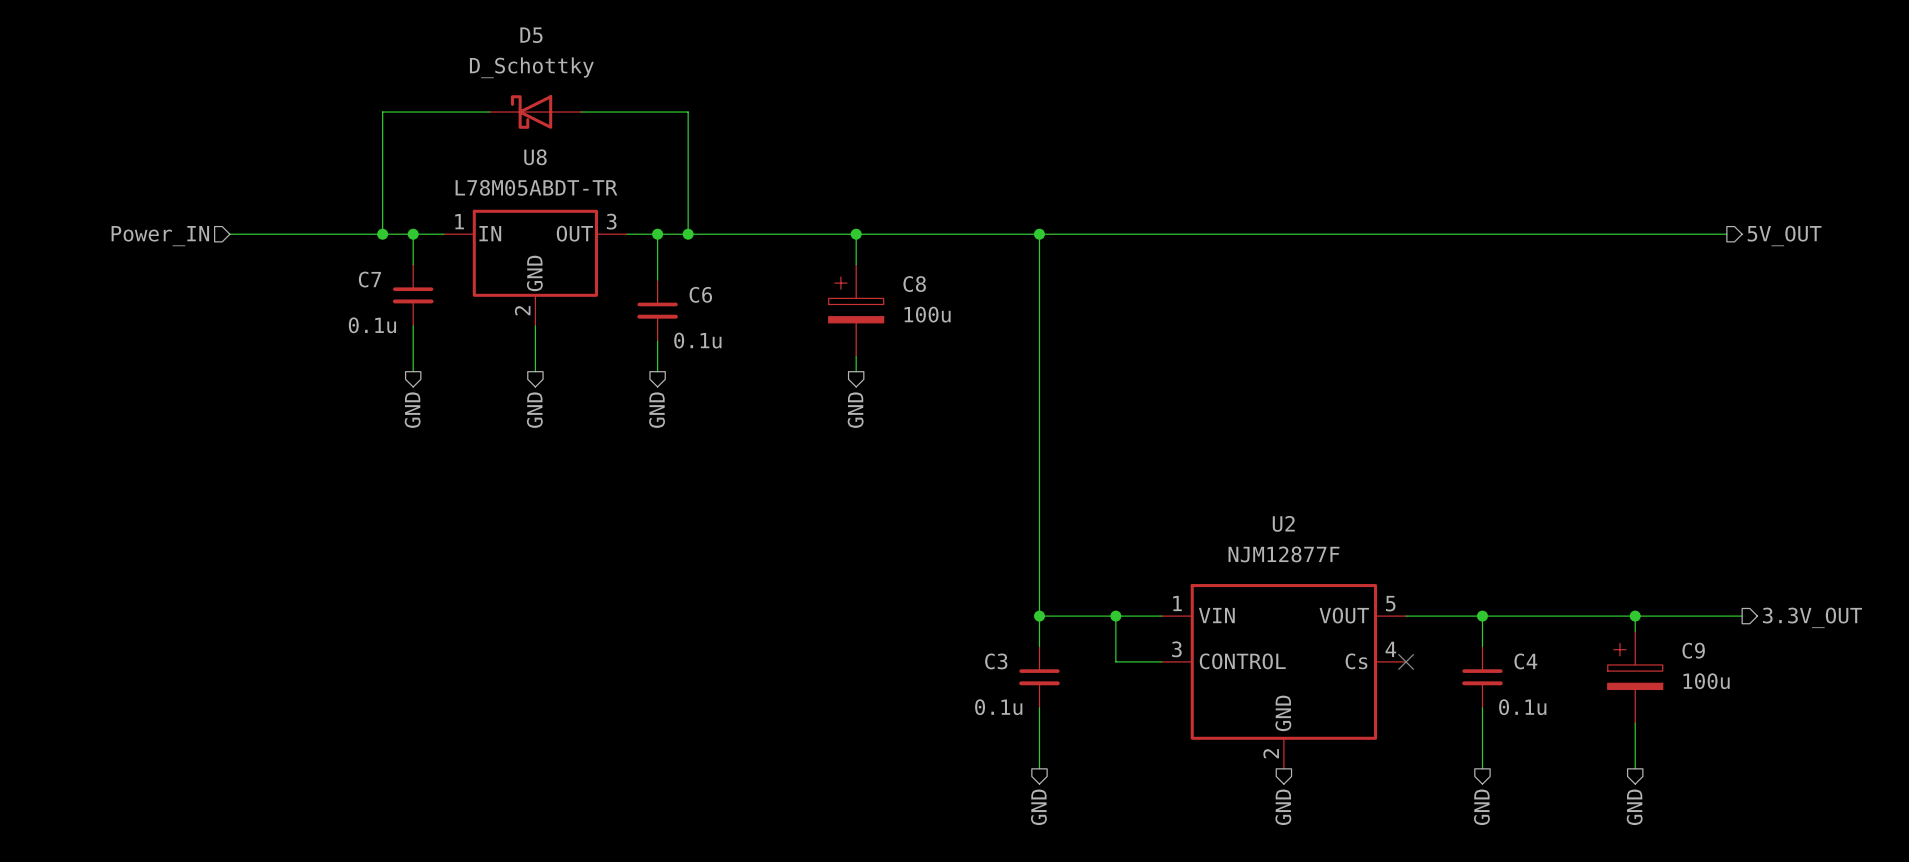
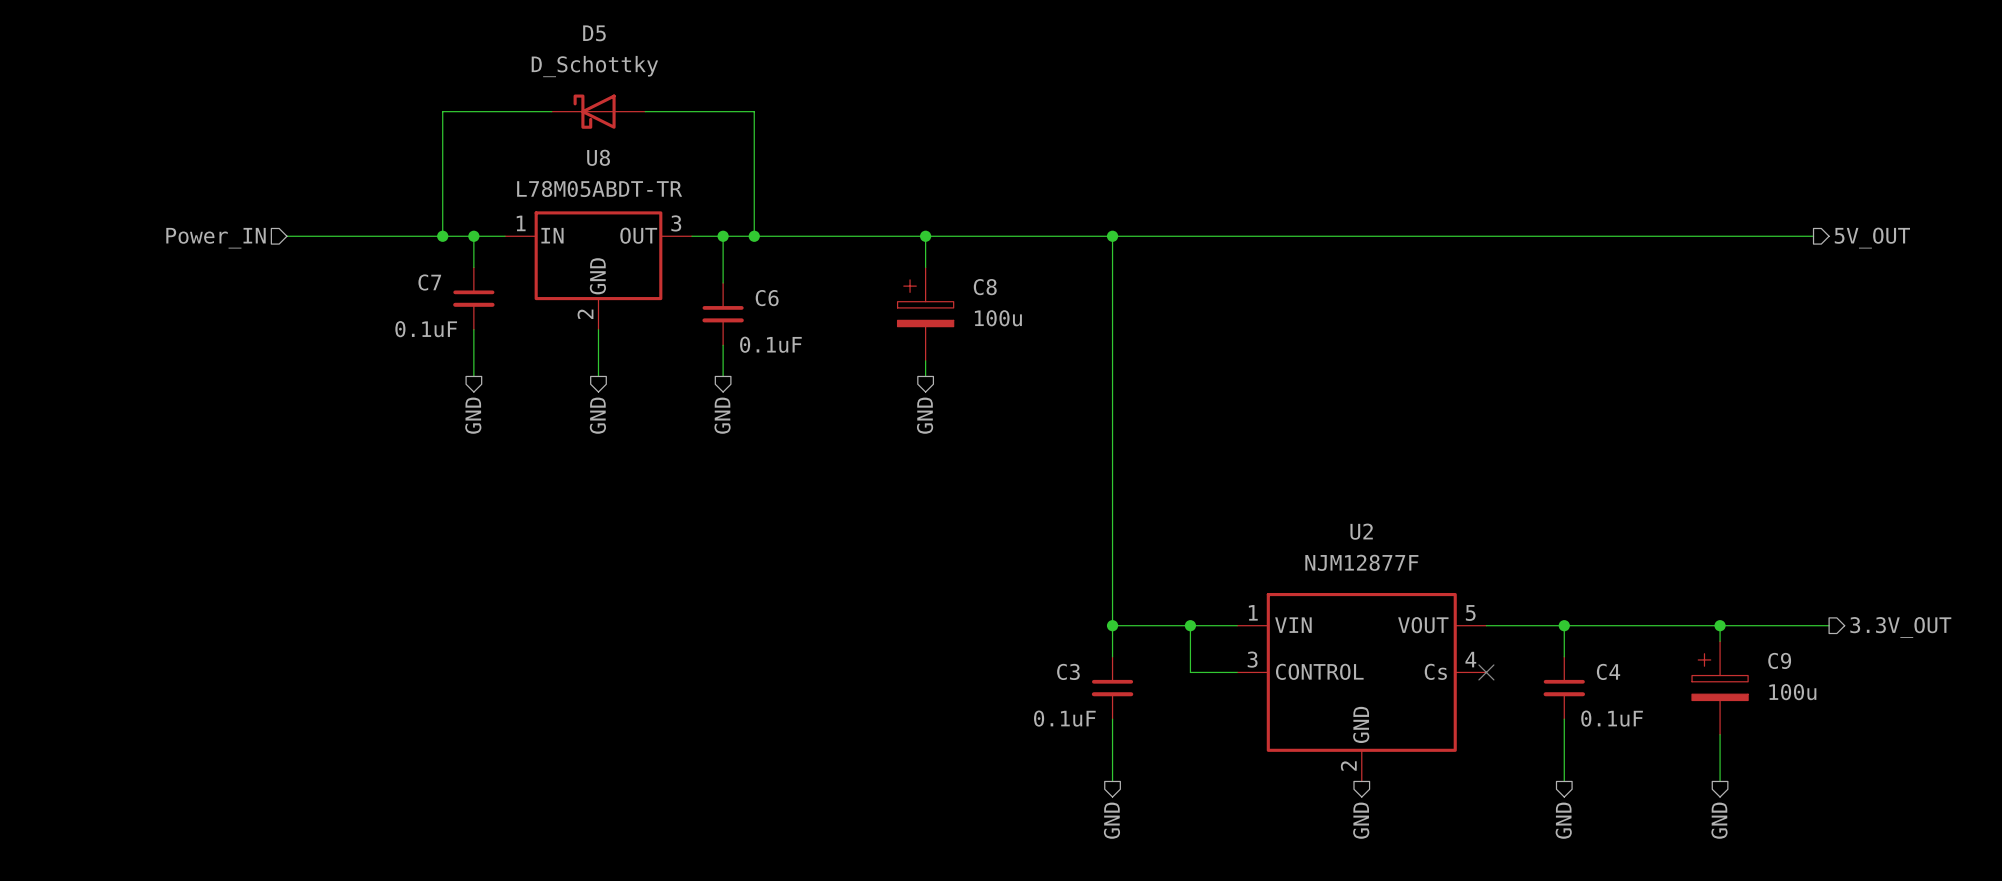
C7 value: 0.1u (372, 325) -> 0.1uF (426, 329)
C6 value: 0.1u (697, 340) -> 0.1uF (770, 344)
C3 value: 0.1u (998, 707) -> 0.1uF (1064, 718)
C4 value: 0.1u (1522, 707) -> 0.1uF (1612, 718)

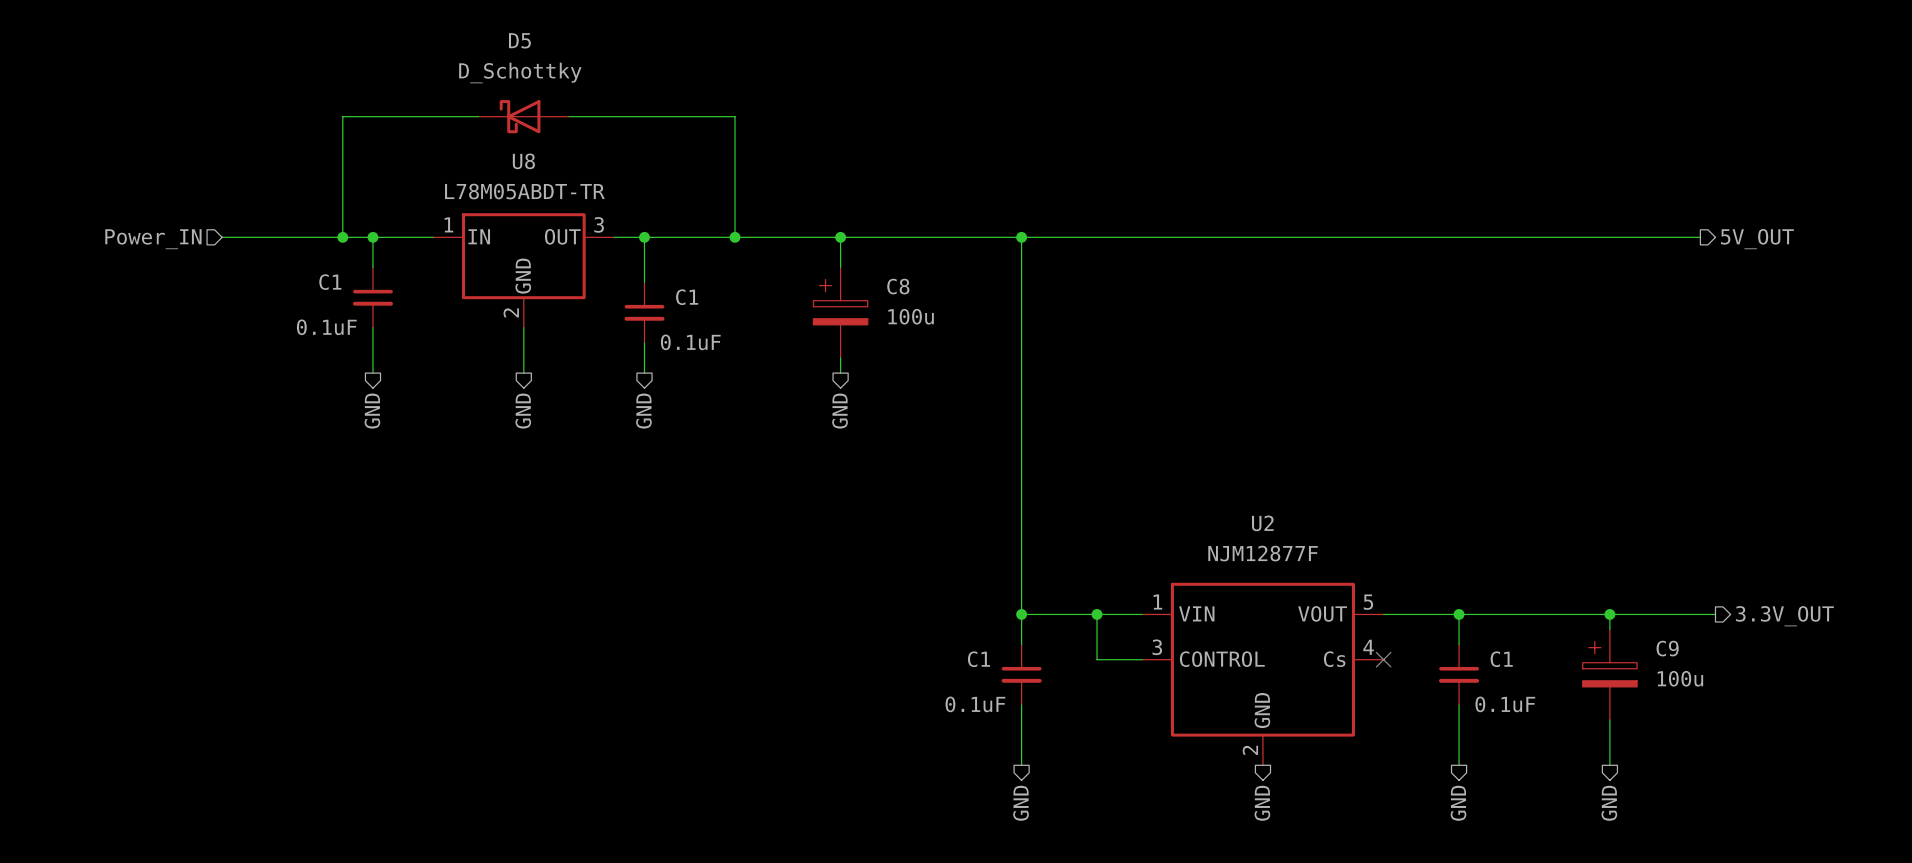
wire: (442, 111) (442, 236) -> (372, 116) (342, 116) (342, 237)
wire: (754, 111) (754, 236) -> (674, 116) (735, 116) (735, 237)
wire: (473, 236) (473, 267) -> (372, 237) (372, 267)
junction position: (473, 236) -> (342, 237)
junction position: (754, 236) -> (735, 237)
C1: none -> 0.1uF (372, 297)
C7: 0.1uF (473, 298) -> none
C6 name: C6 (767, 298) -> C1 (687, 297)
wire: (473, 329) (473, 376) -> (372, 327) (372, 373)
hierarchical label position: GND (473, 415) -> GND (372, 411)
C3 name: C3 (1068, 671) -> C1 (978, 659)
C4 name: C4 (1608, 671) -> C1 (1501, 659)

